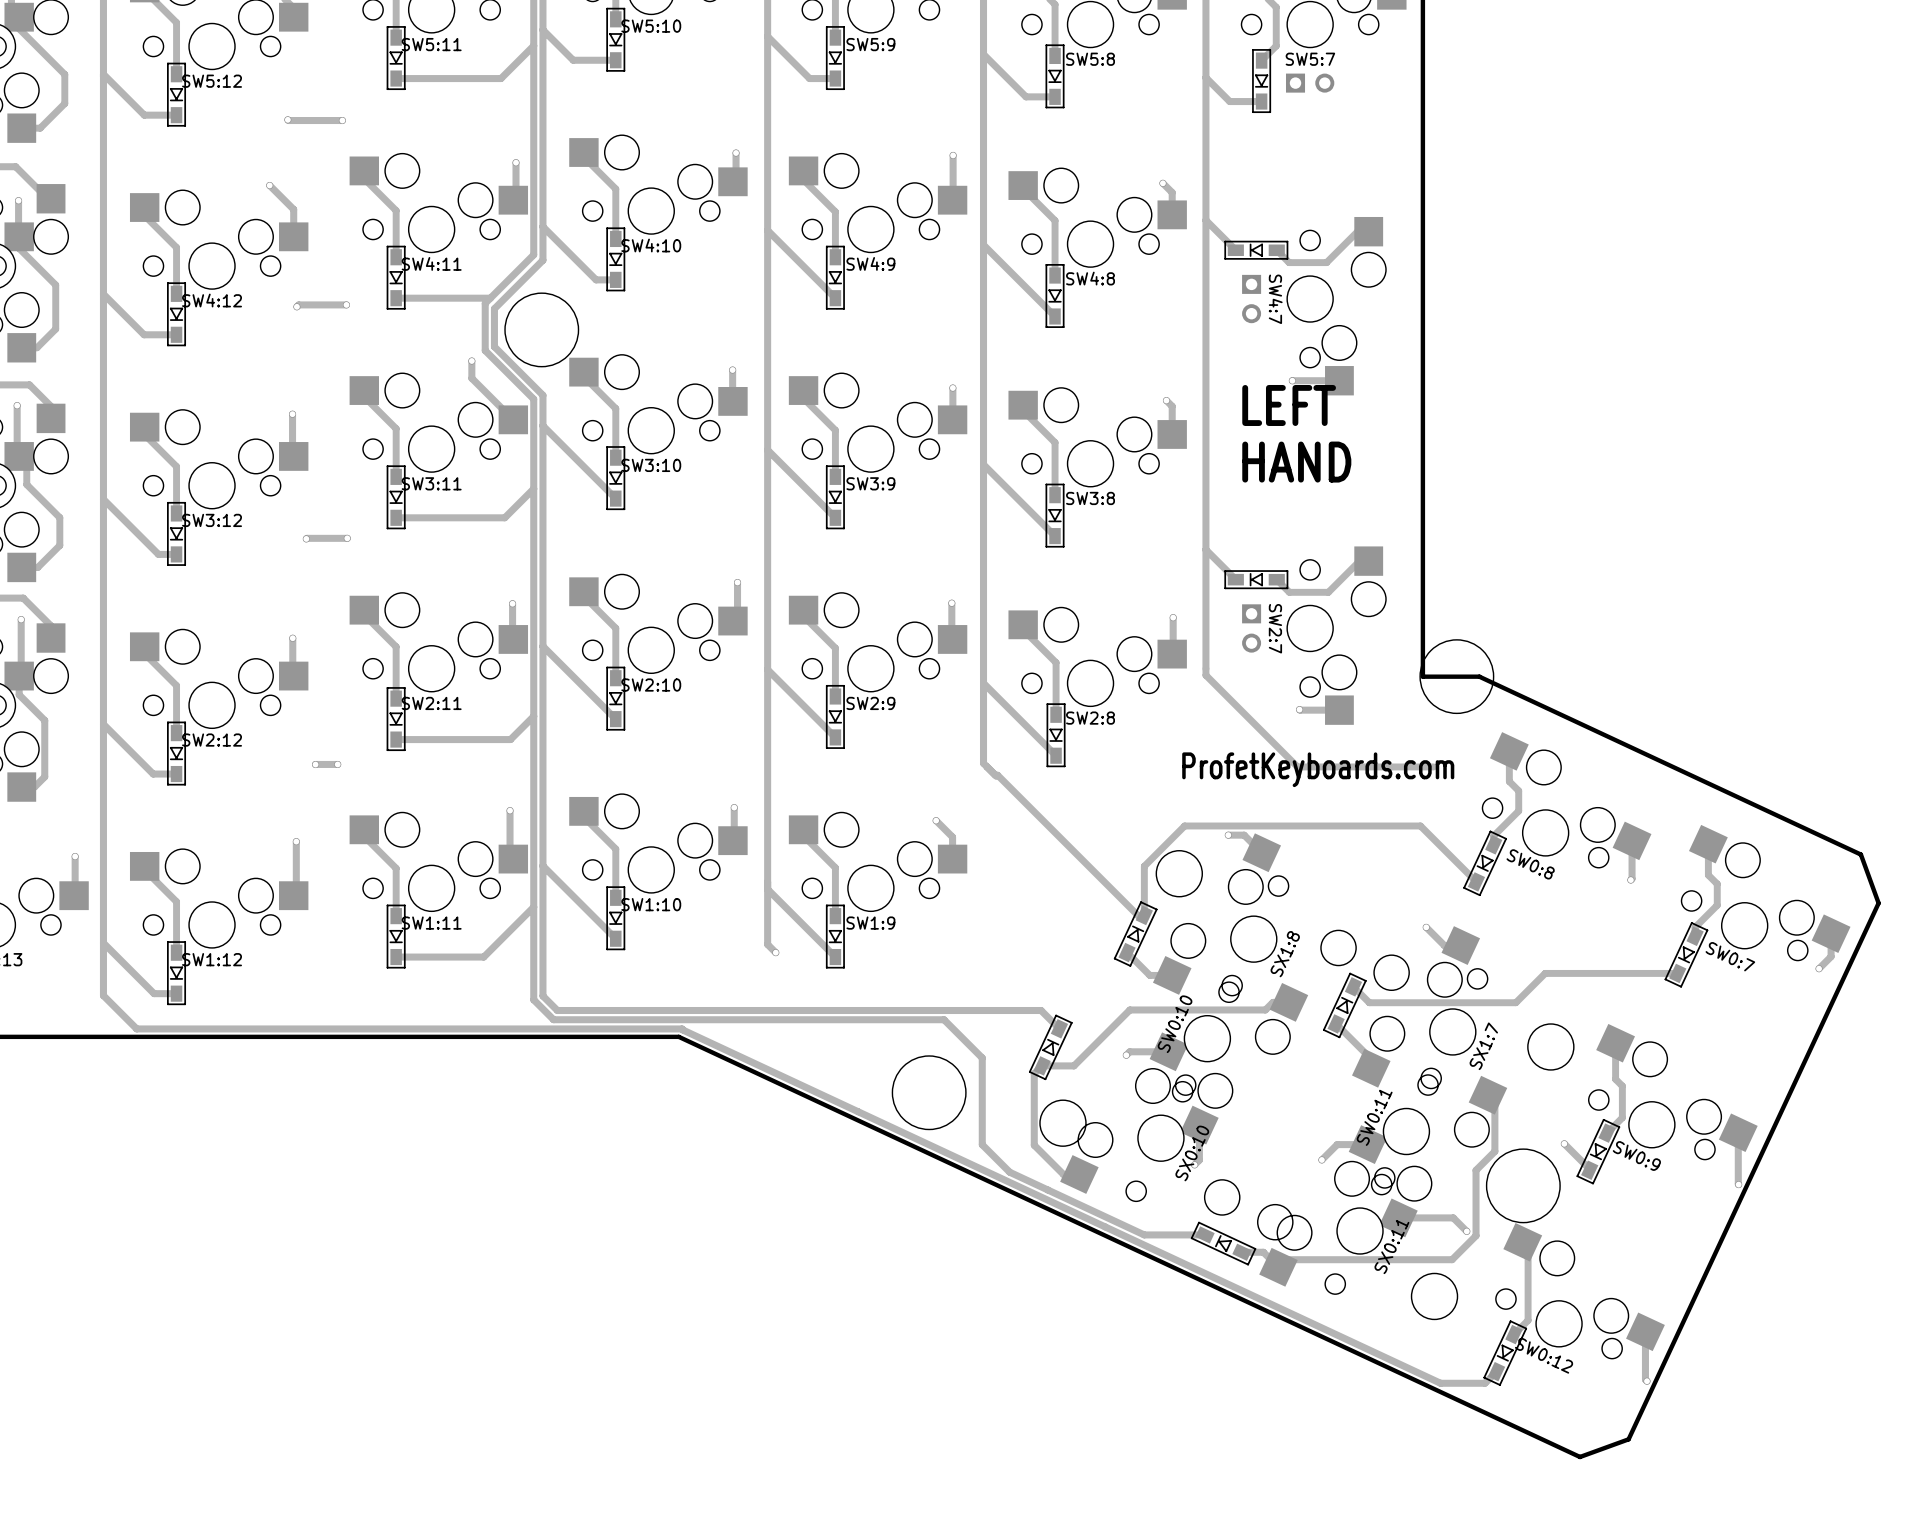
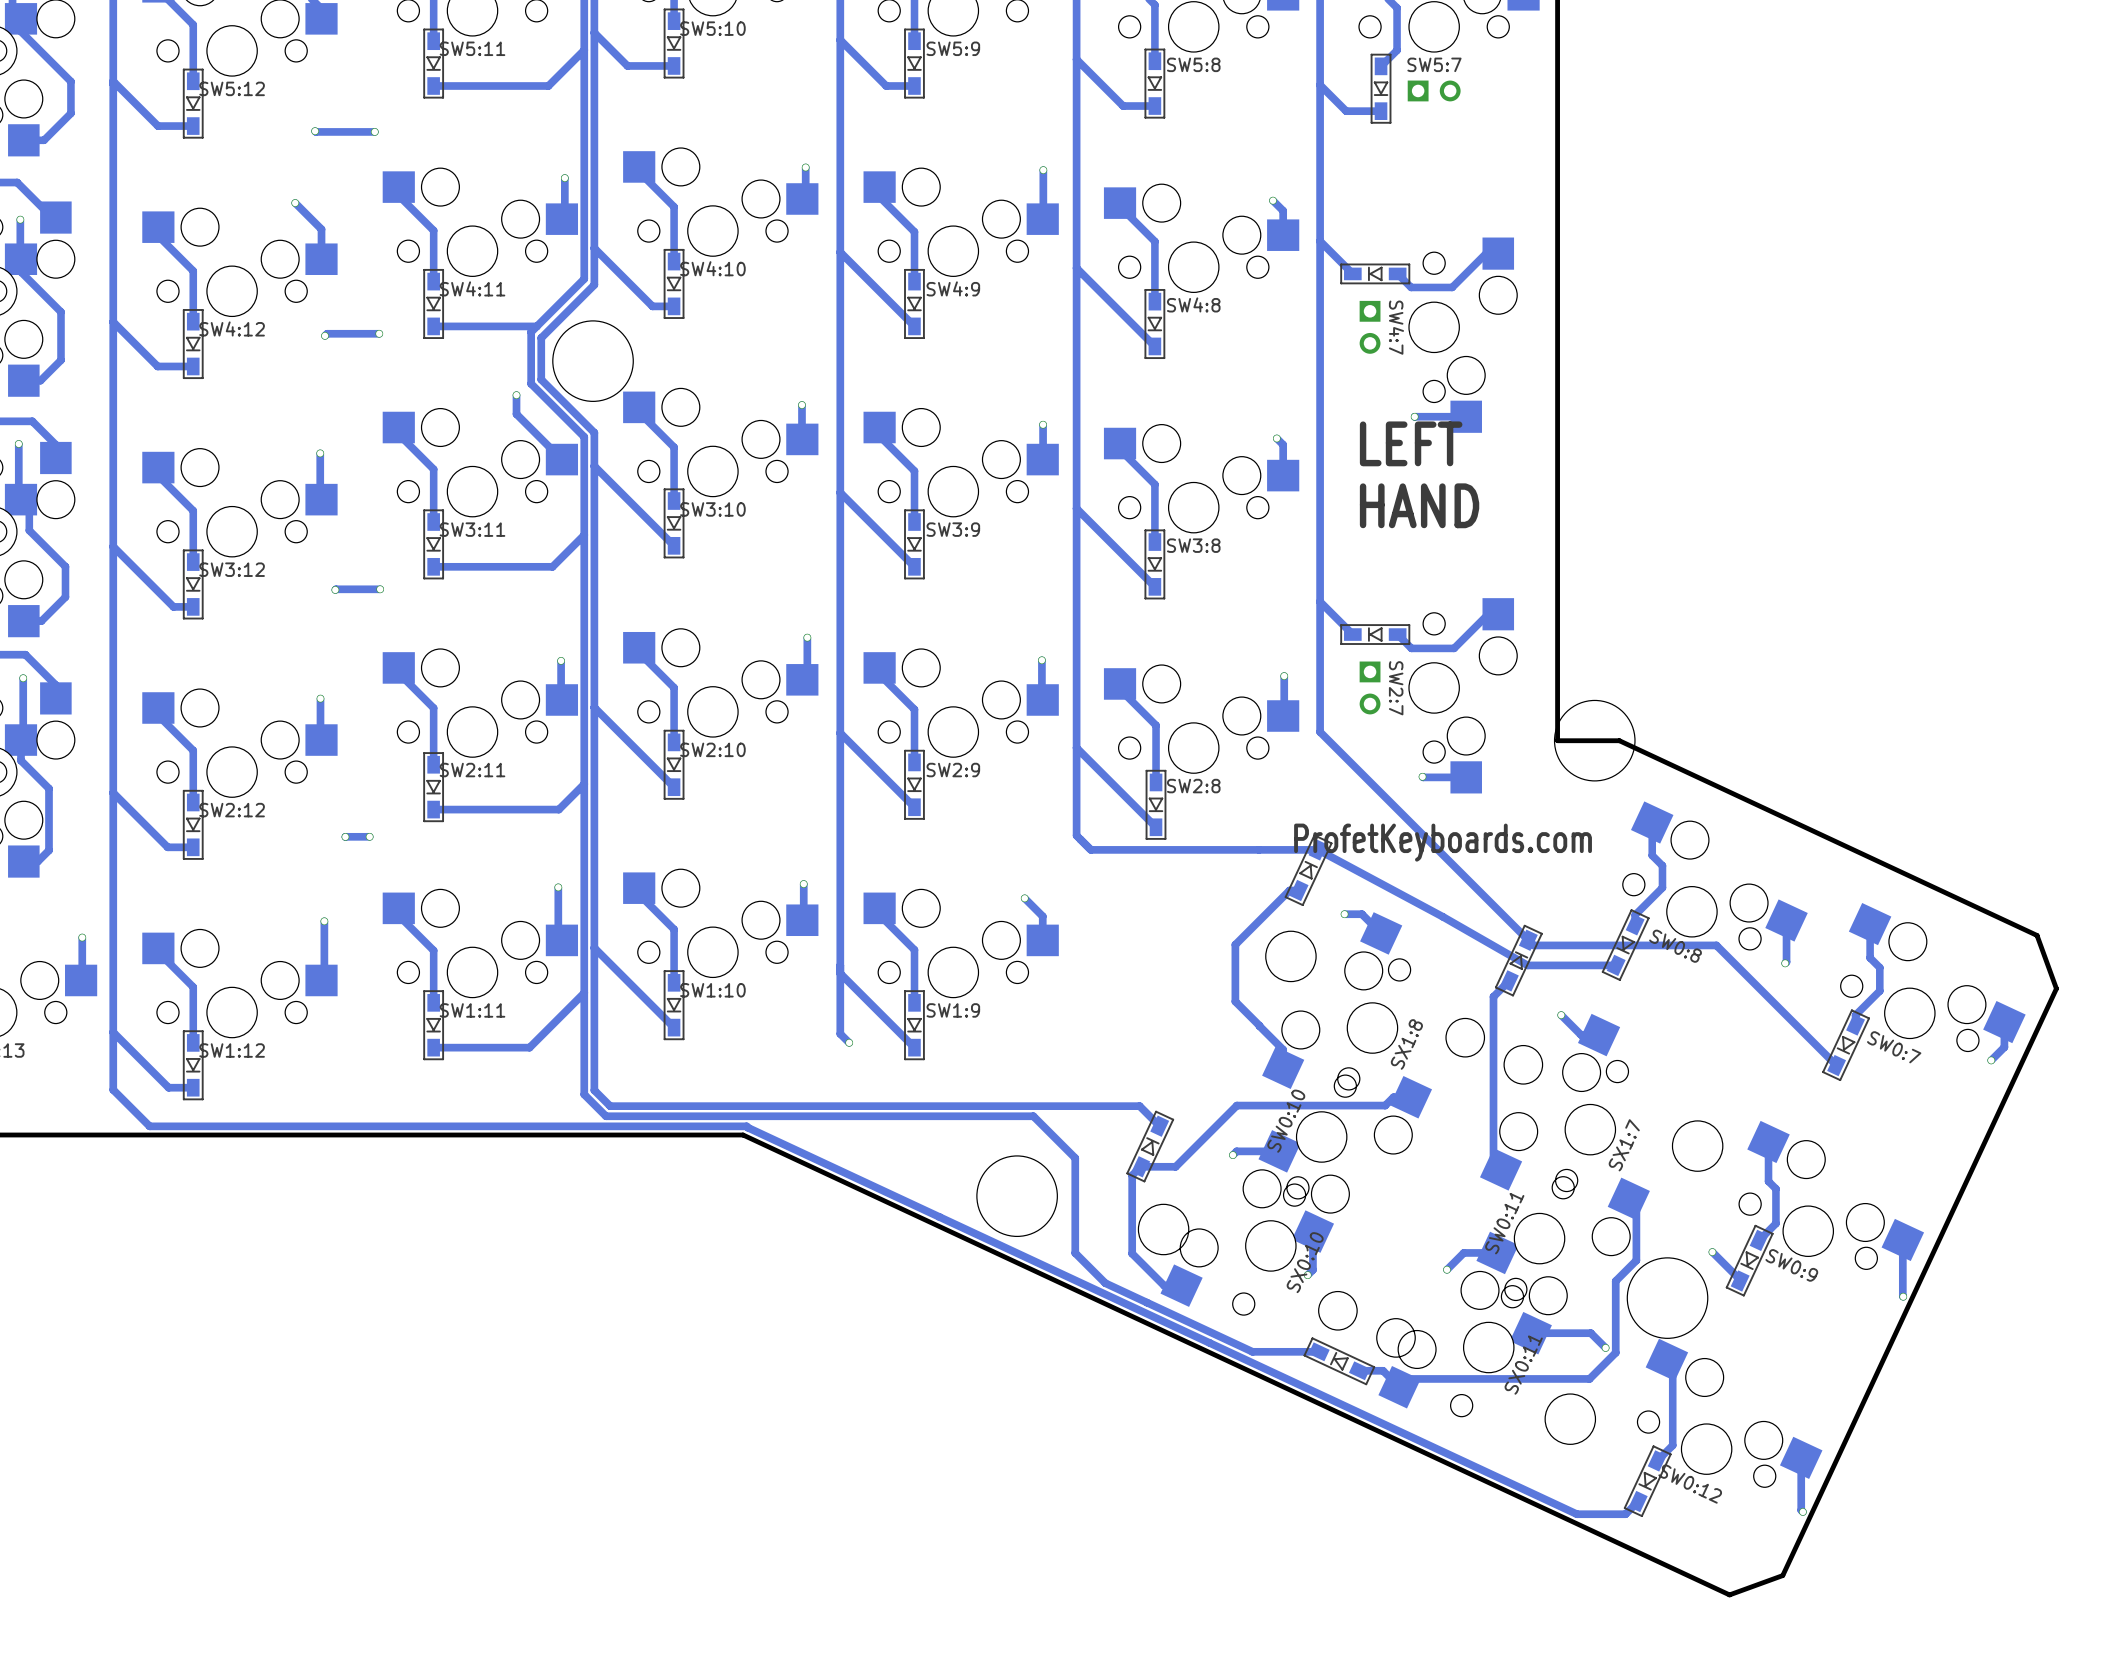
track: (1205, 668) (1205, 675) (1297, 766) (1433, 766) -> (1320, 732) (1533, 945) (1716, 945) (1836, 1065)
track: (995, 775) (997, 775) (1137, 915) (1144, 915) (1144, 866) (1184, 825) (1420, 825) (1476, 881) -> (1090, 849) (1318, 849) (1442, 916) (1527, 965) (1616, 965)
part: none -> (1308, 870)
part: none -> (1518, 960)
track: none -> (1509, 980) (1493, 996) (1493, 1161)
part: (1135, 934) -> none
track: (1127, 952) (1149, 975) (1172, 975) -> (1299, 890) (1289, 890) (1235, 944) (1235, 1001) (1283, 1049) (1283, 1067)
track: (1677, 973) (1545, 973) (1515, 1002) (1369, 1002) (1353, 986) -> none
part: (1344, 1005) -> none
track: (1336, 1023) (1371, 1059) (1371, 1068) -> none

